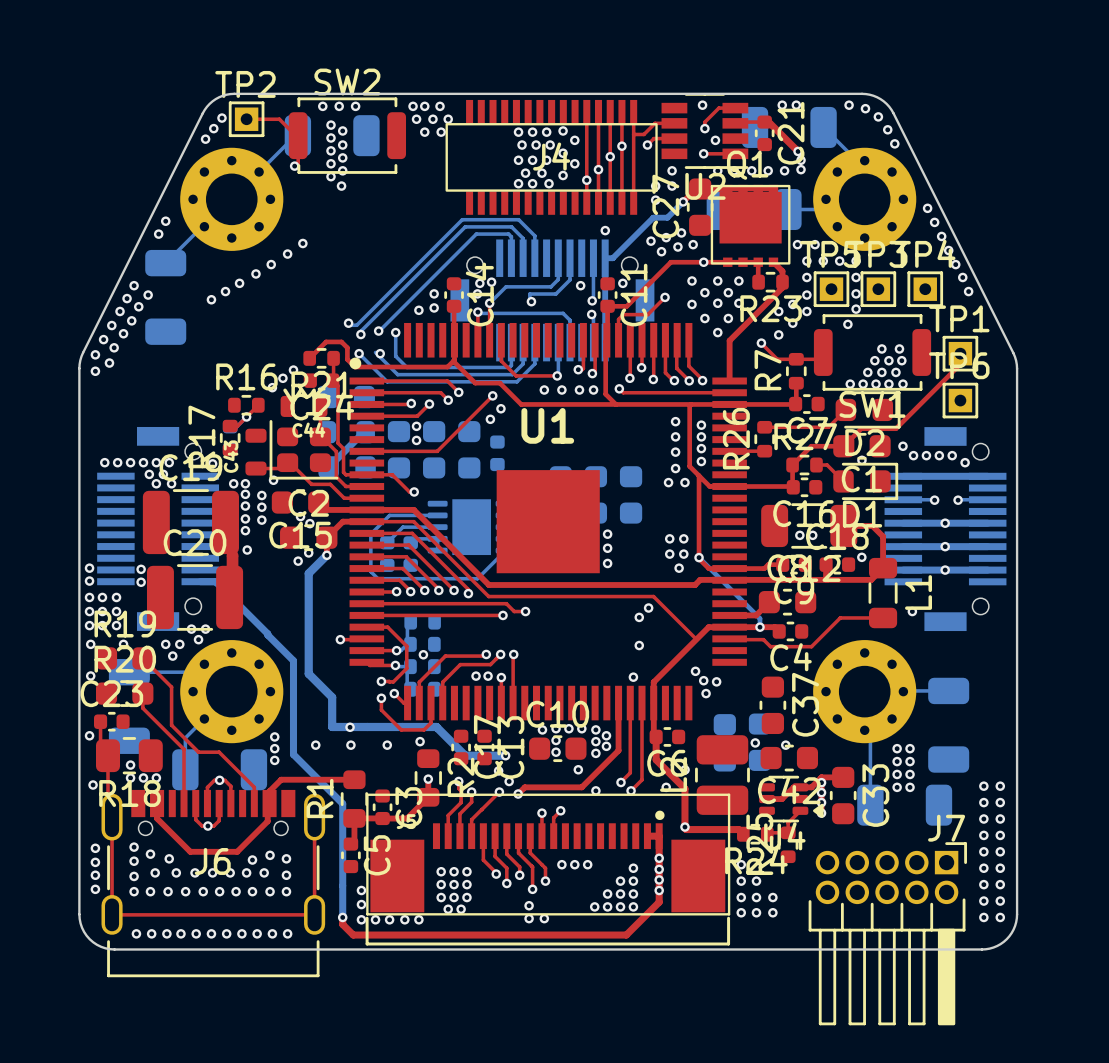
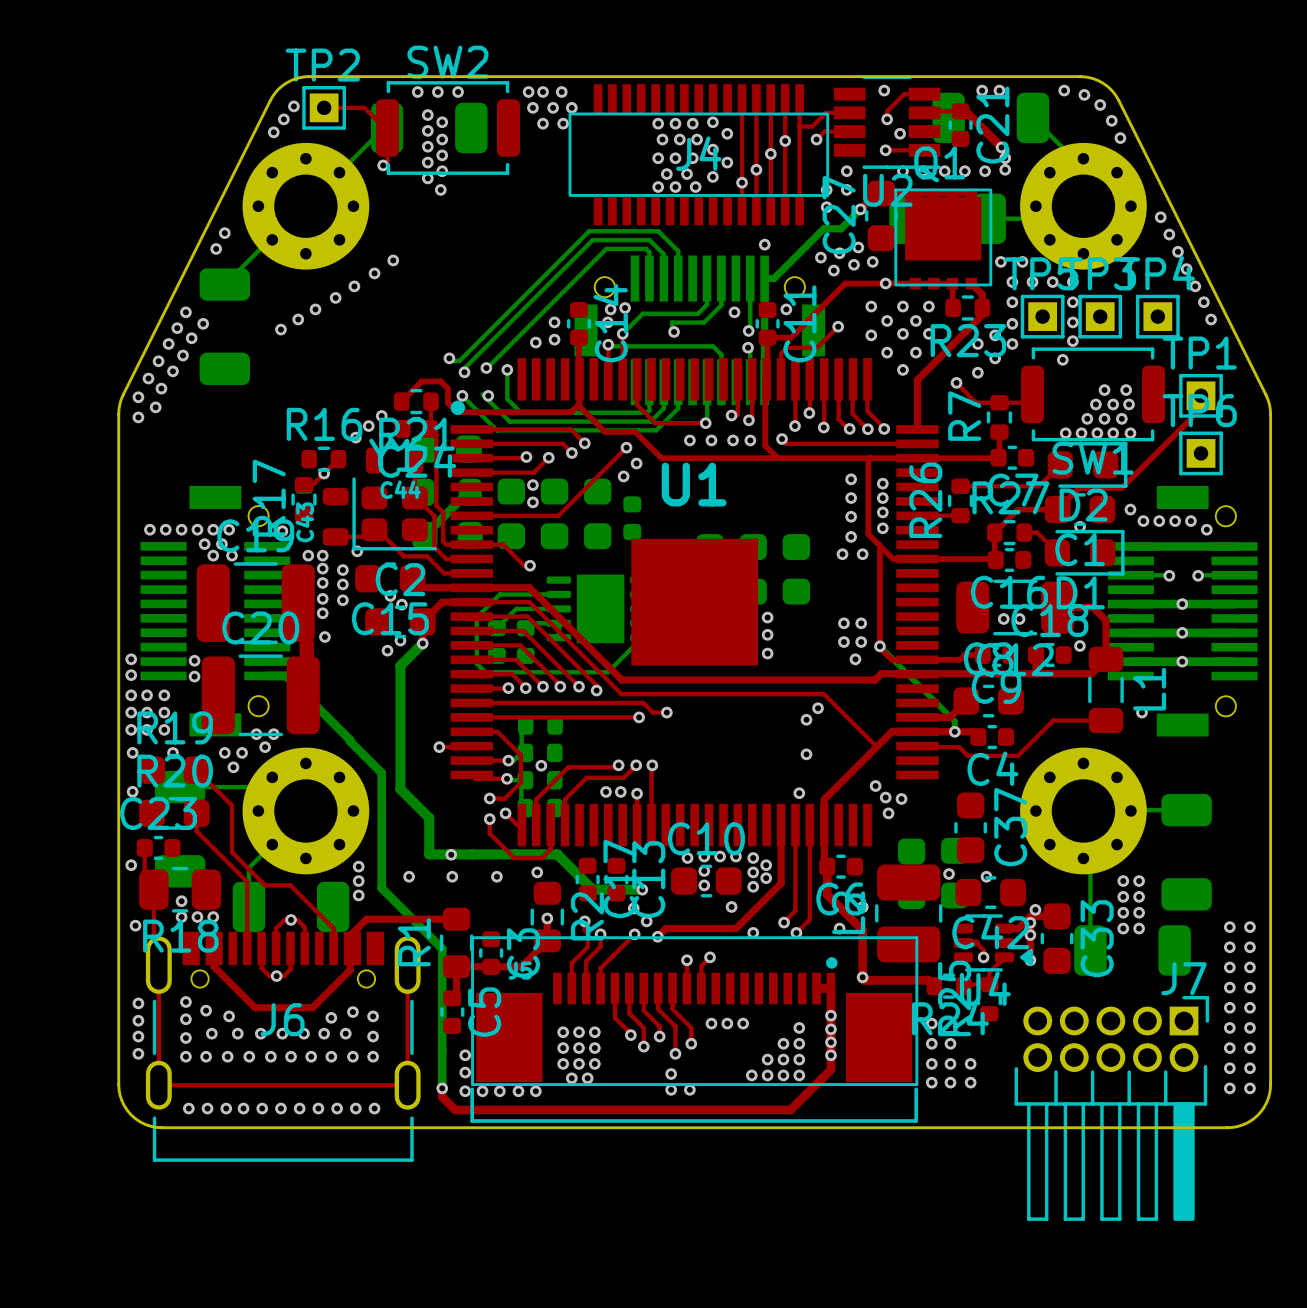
via: none -> (1035, 909)
top track: (800, 787) (793, 787) (781, 799) (777, 799) -> (983, 957) (983, 950) (976, 942)
via: (821, 802) -> none
via: none -> (983, 957)

